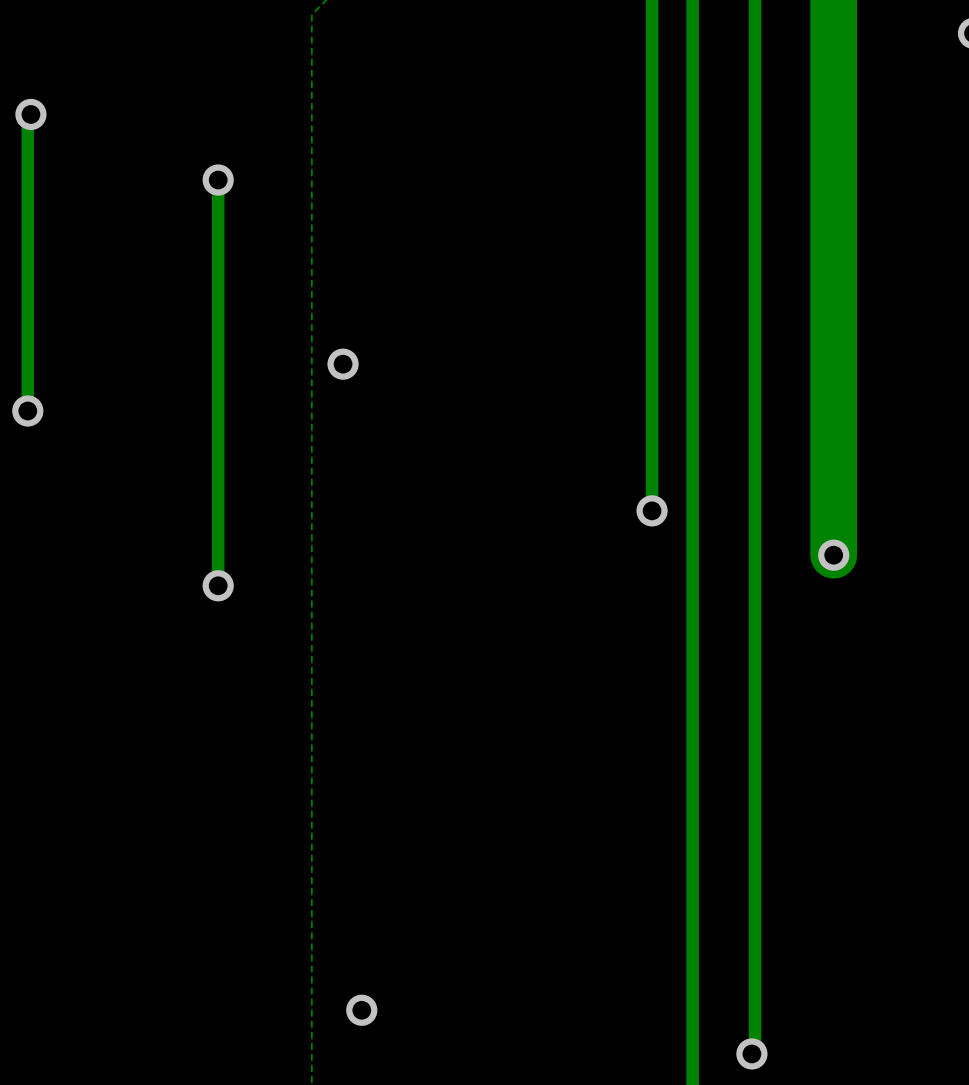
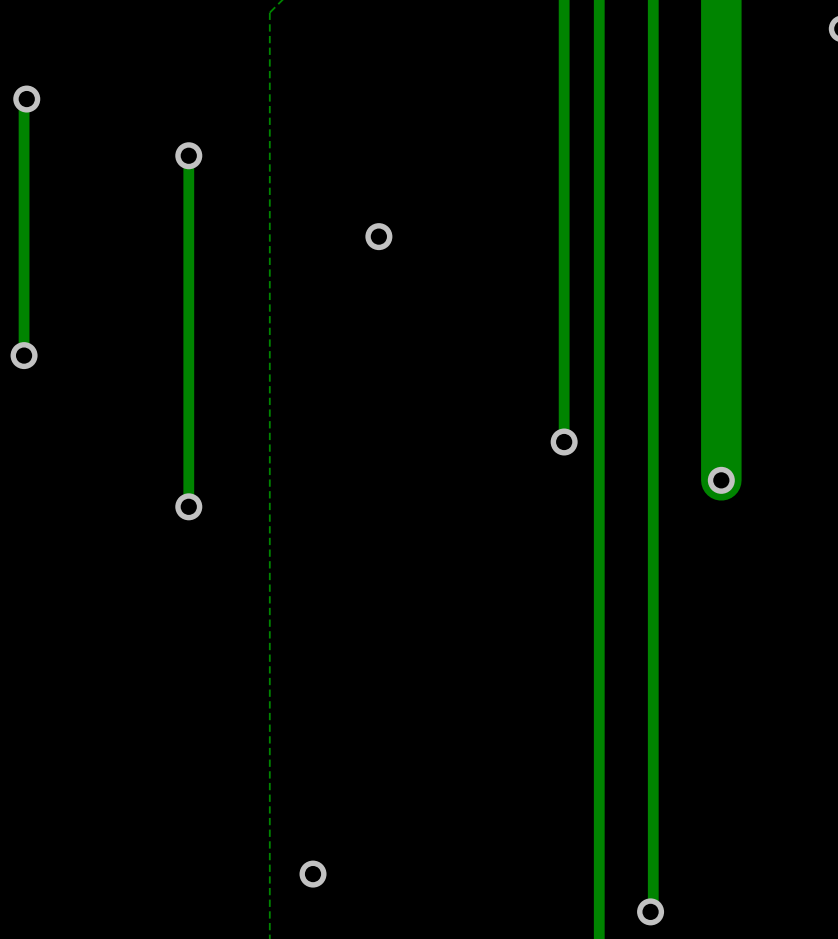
via position: (343, 364) -> (378, 236)

